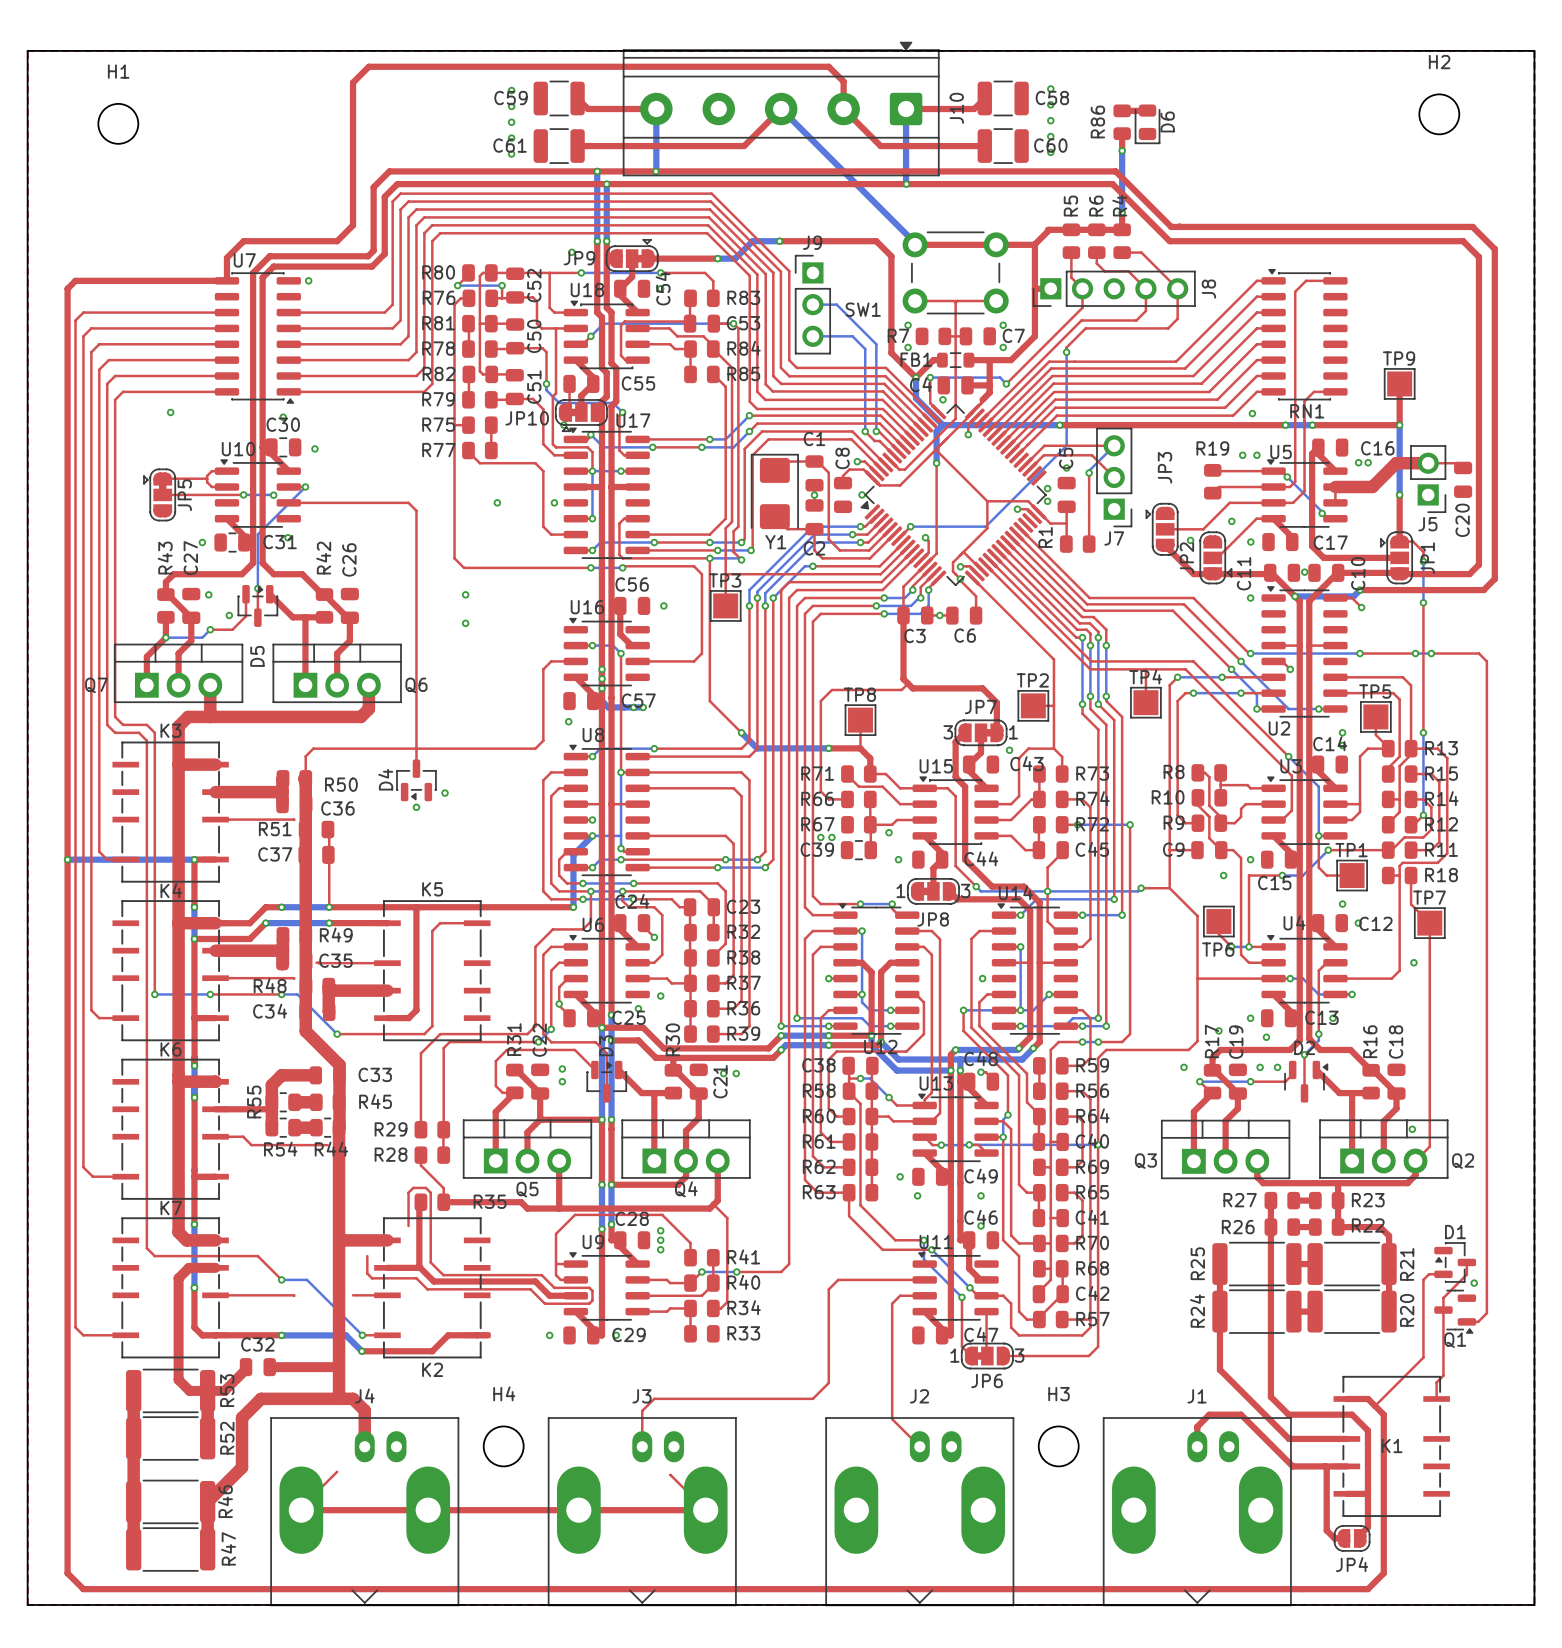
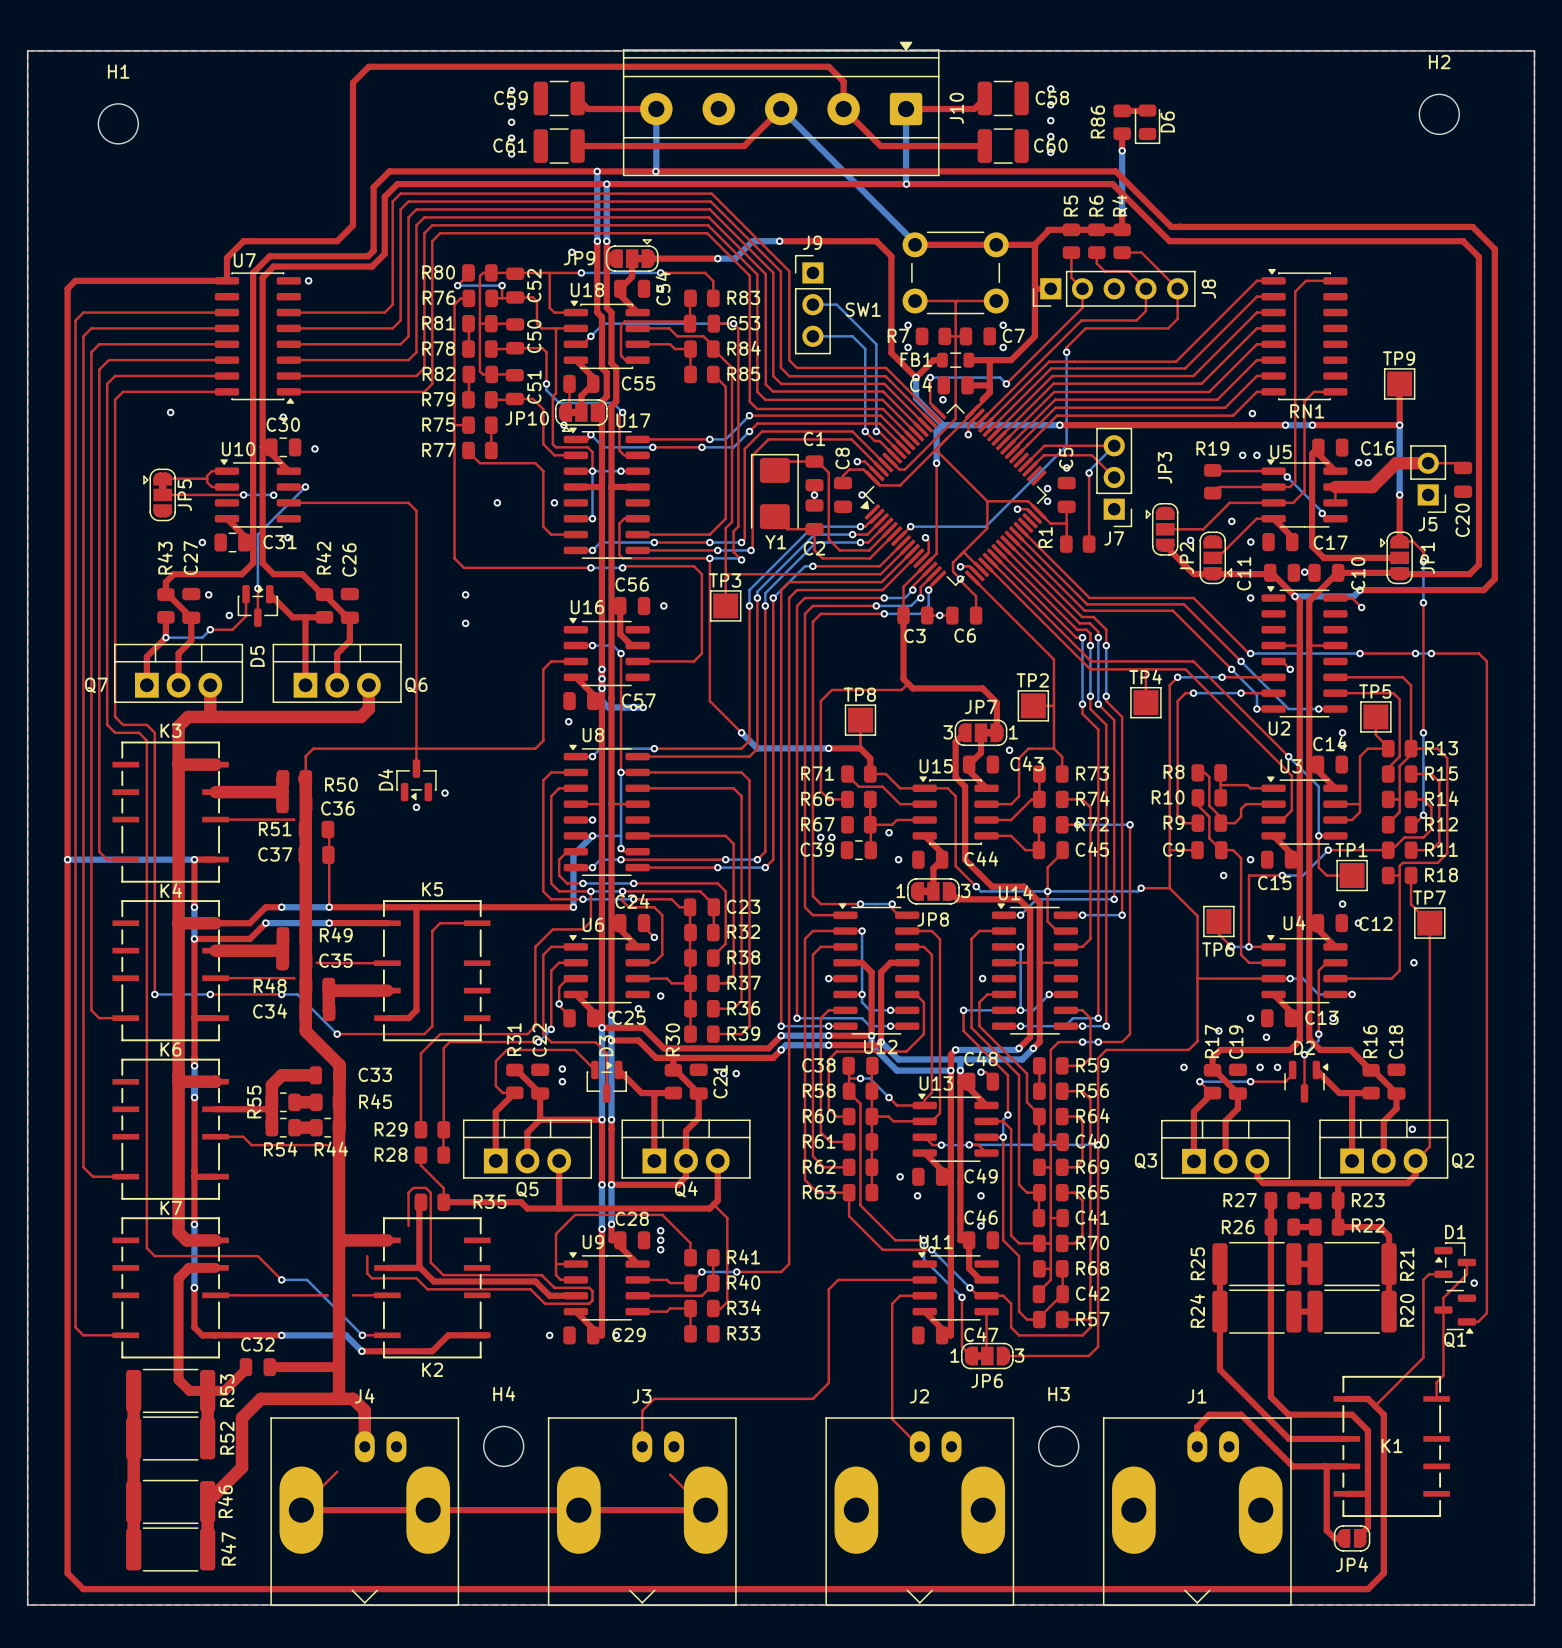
top track: (293, 1295) (294, 1295) -> (293, 1295) (327, 1295)

